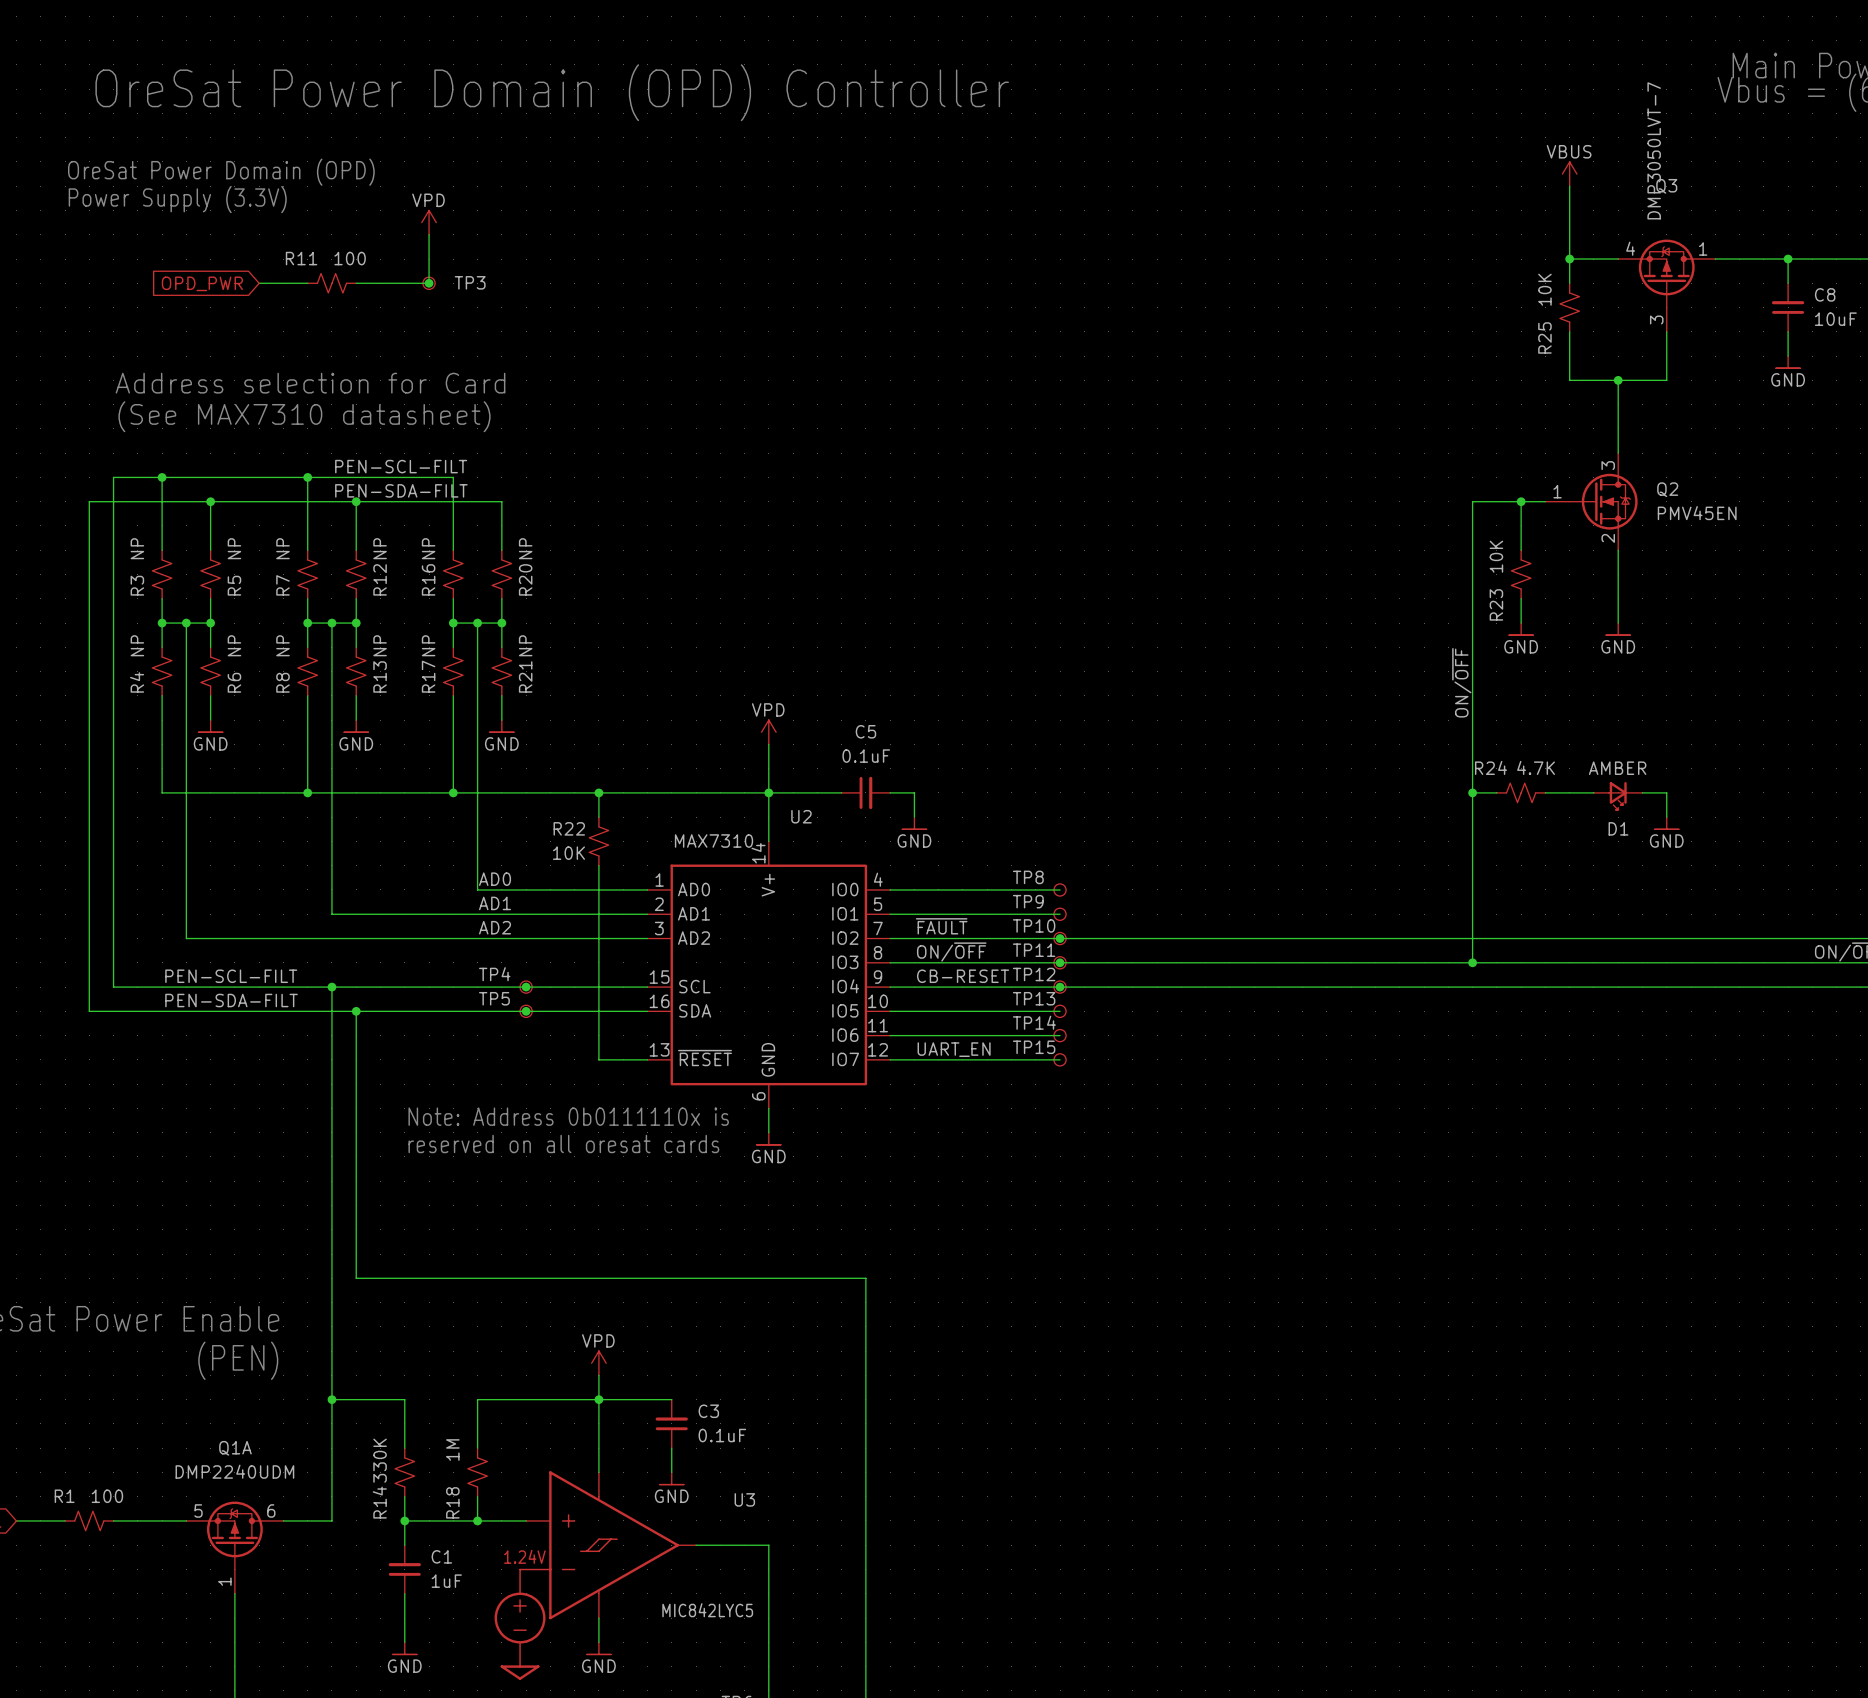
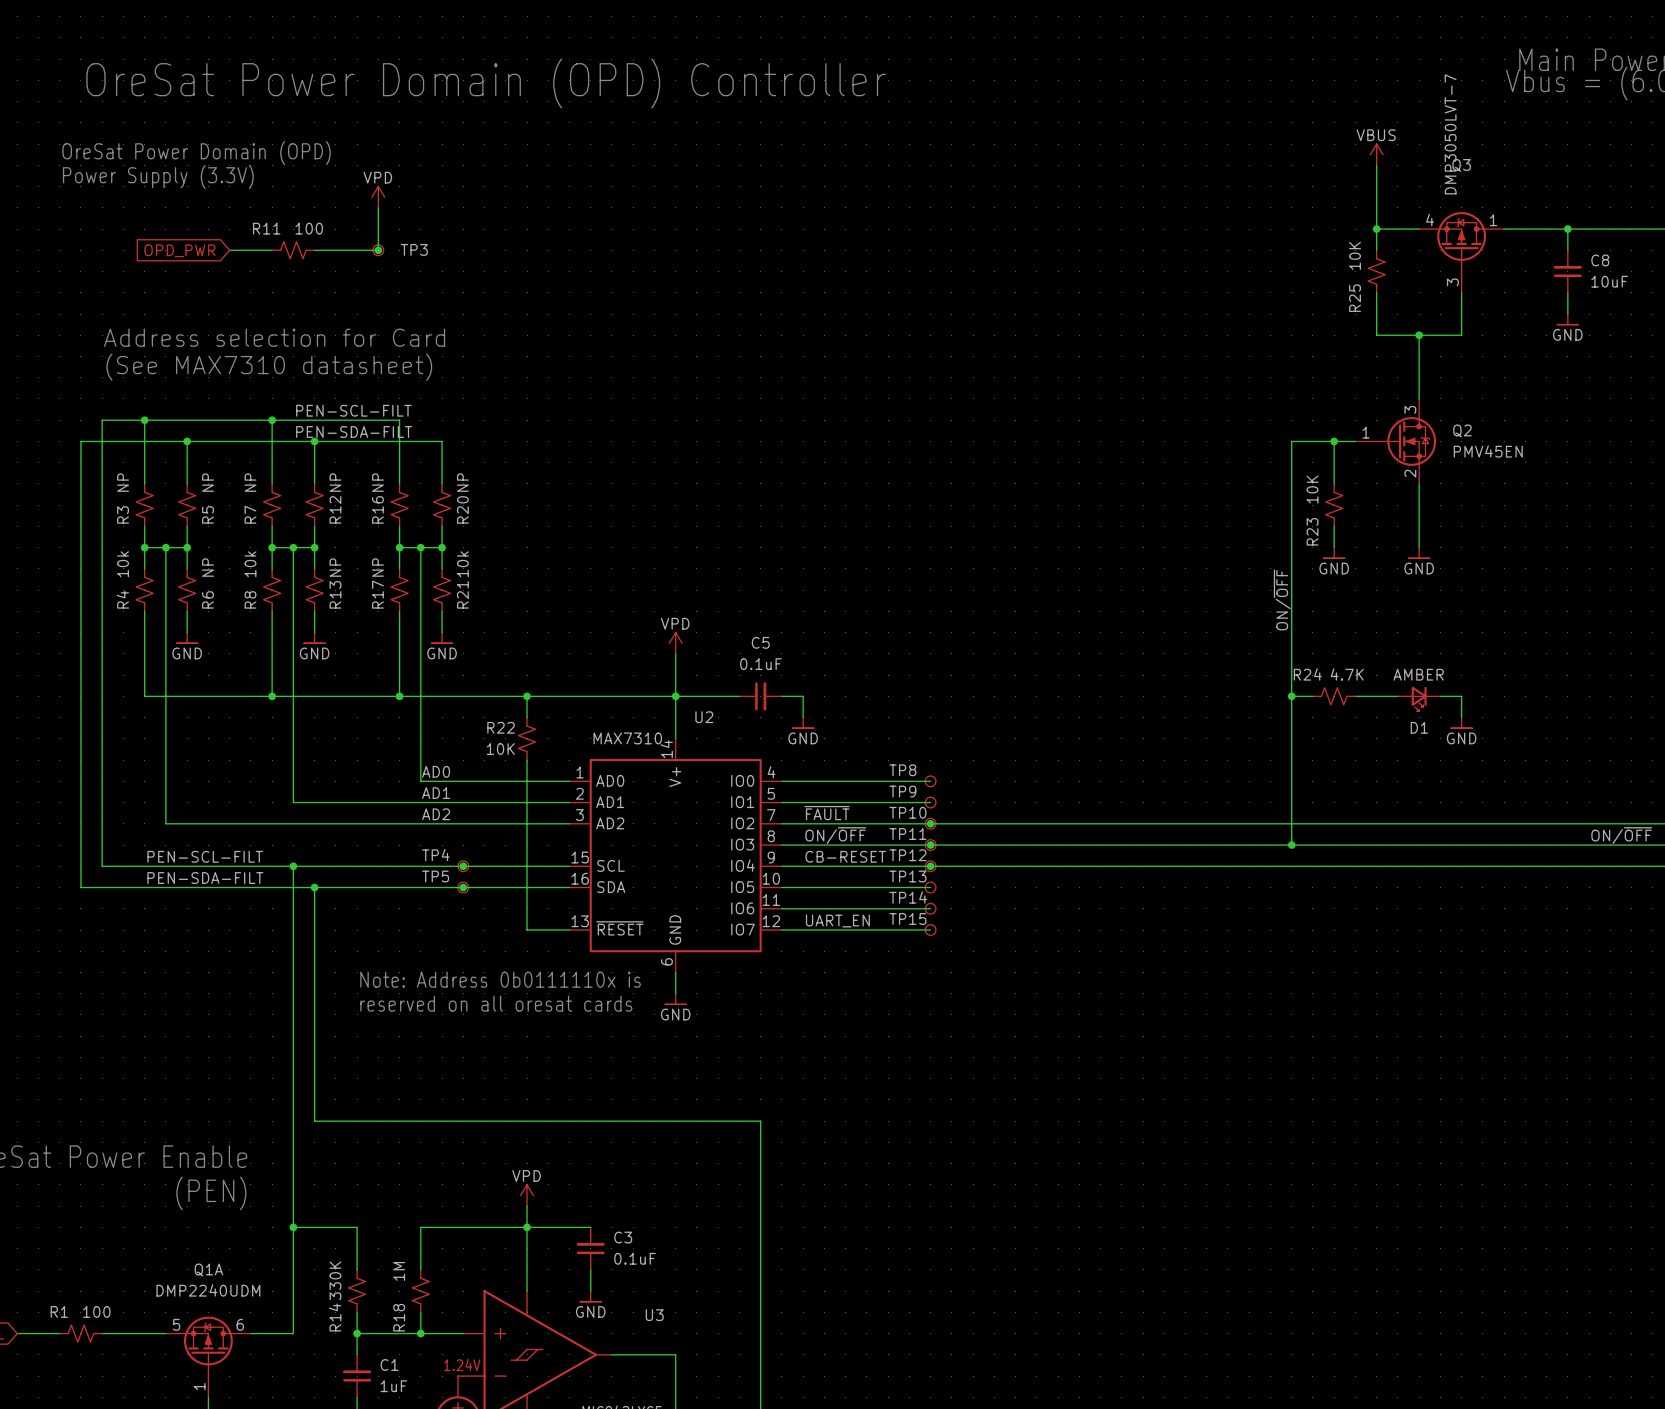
R4 value: NP (137, 645) -> 10k (123, 564)
R8 value: NP (282, 645) -> 10k (250, 564)
R21 value: NP (525, 645) -> 10k (462, 564)

